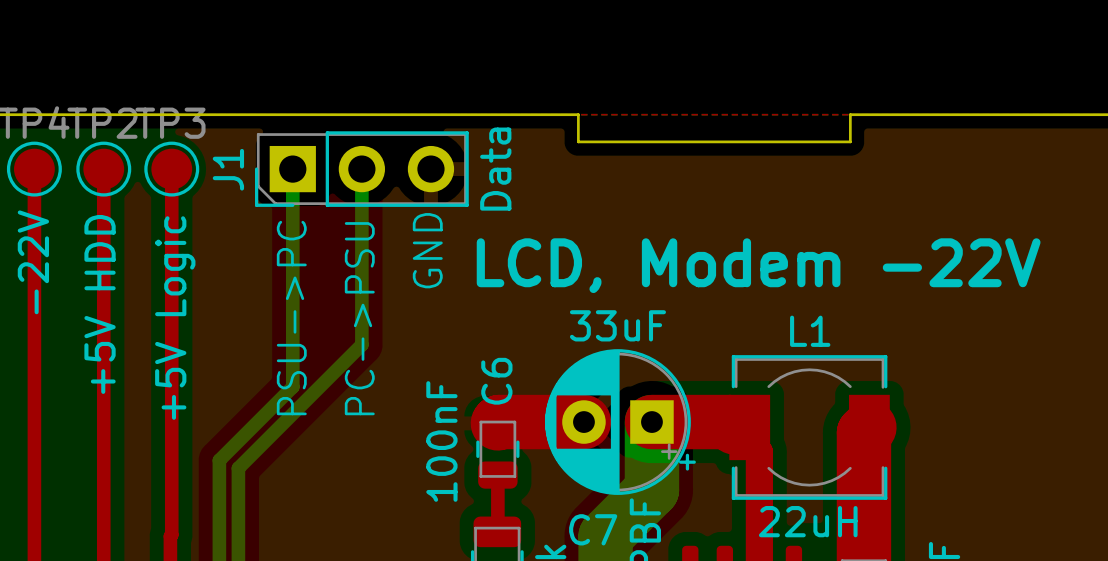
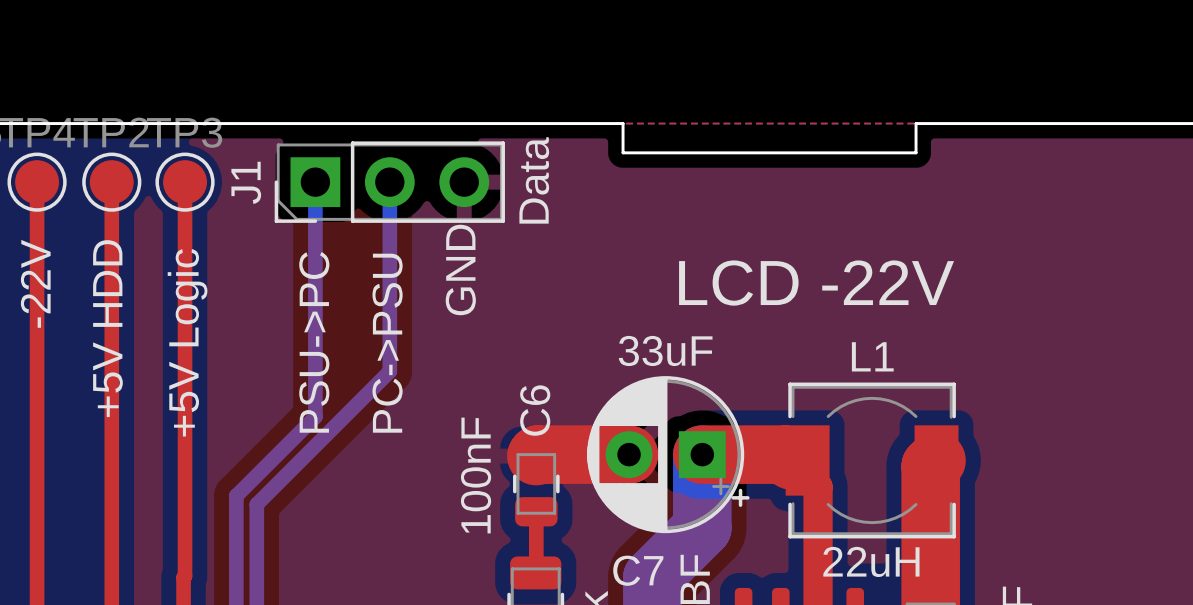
text: LCD, Modem -22V (758, 265) -> LCD -22V (816, 283)

